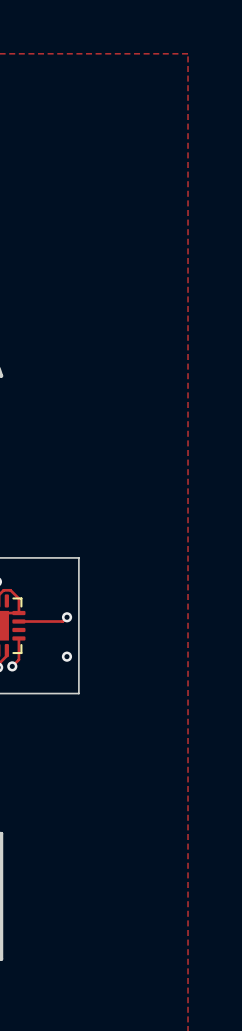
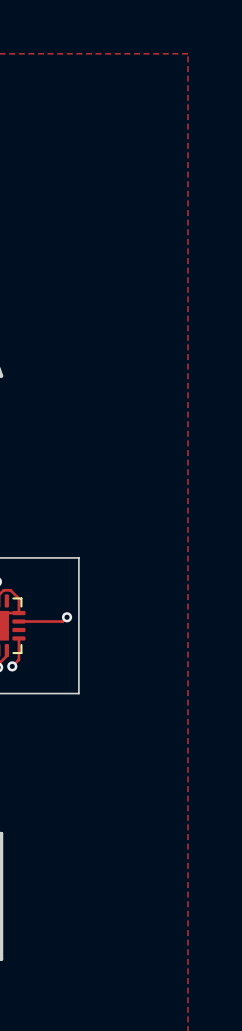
via: (66, 656) -> none

